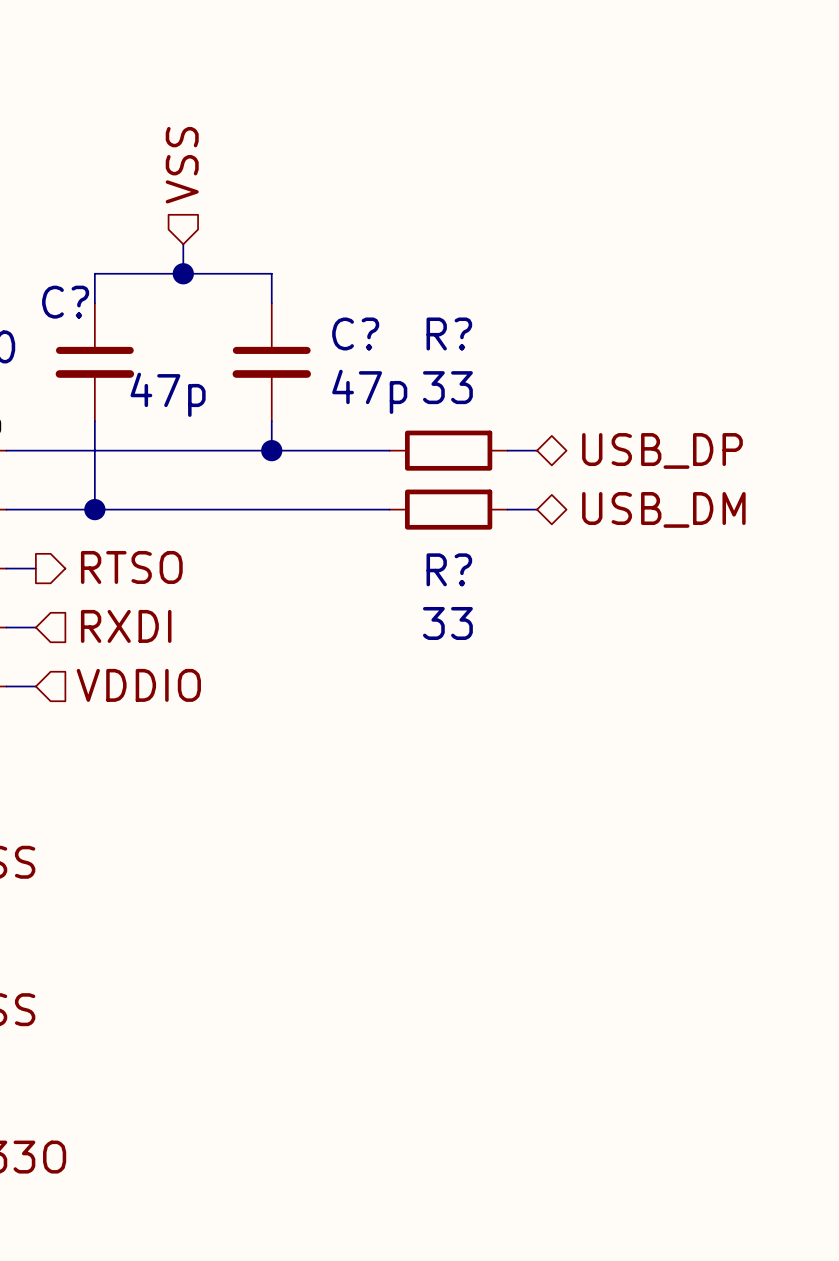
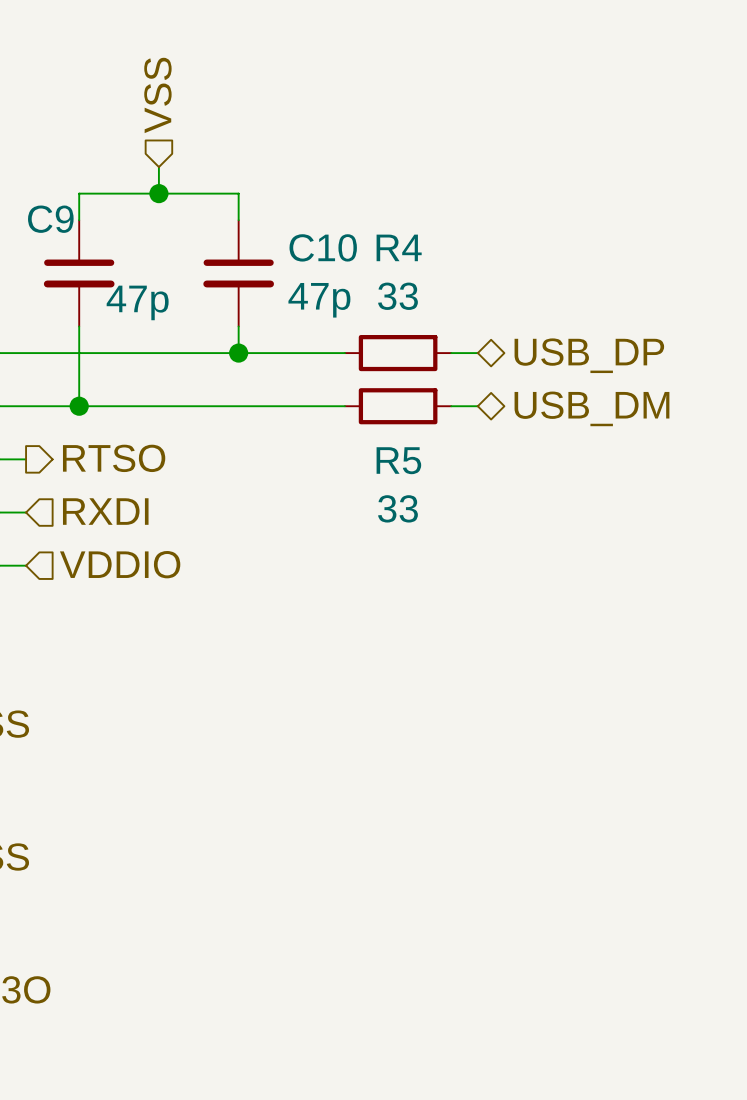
C? name: C? (65, 302) -> C9 (50, 219)
C? name: C? (355, 333) -> C10 (323, 247)
R? name: R? (449, 333) -> R4 (399, 247)
R? name: R? (449, 569) -> R5 (398, 460)

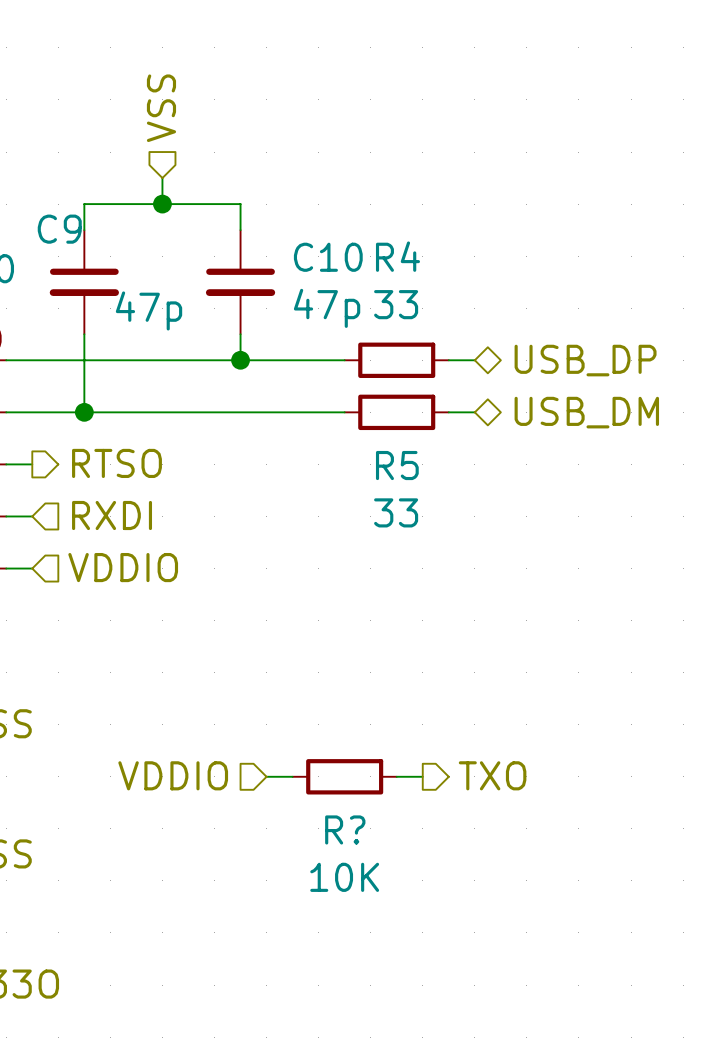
hierarchical label: none -> VDDIO (173, 775)
hierarchical label: none -> TXO (492, 775)
wire: none -> (266, 776) (292, 776)
R?: none -> 10K (344, 776)
wire: none -> (396, 776) (422, 776)

